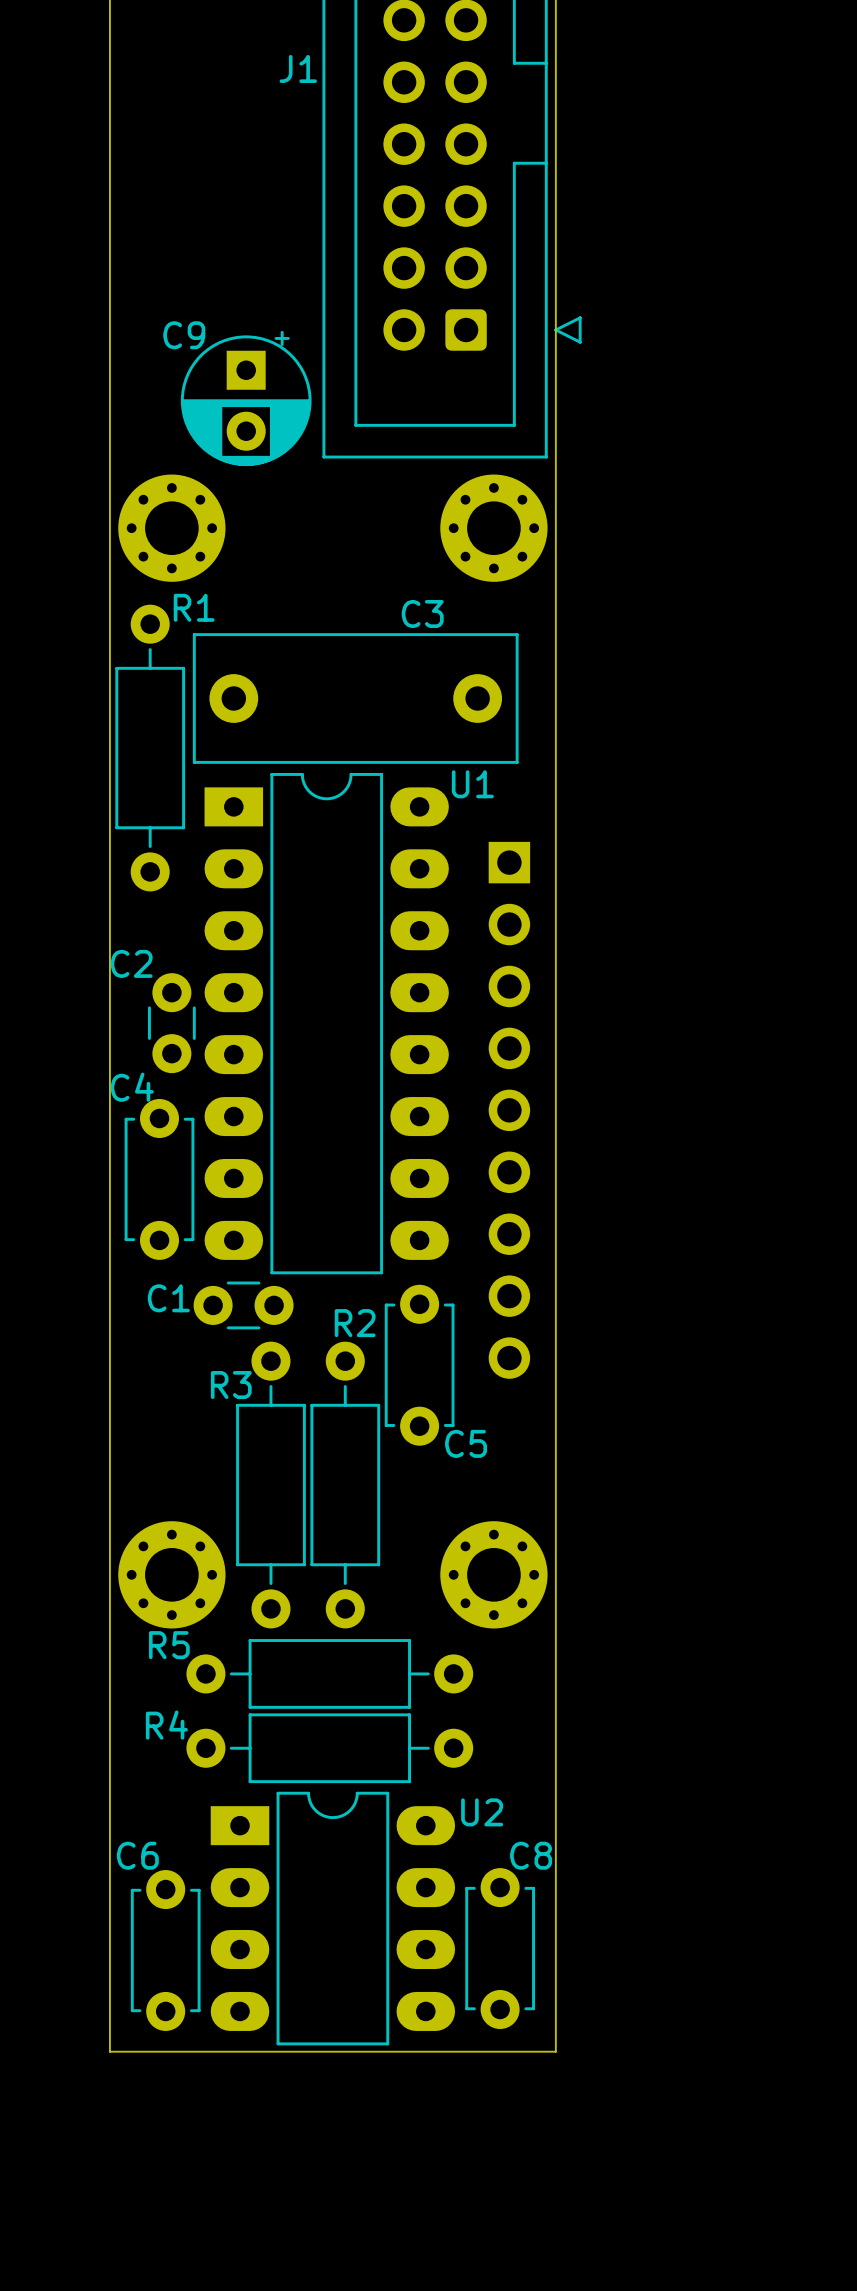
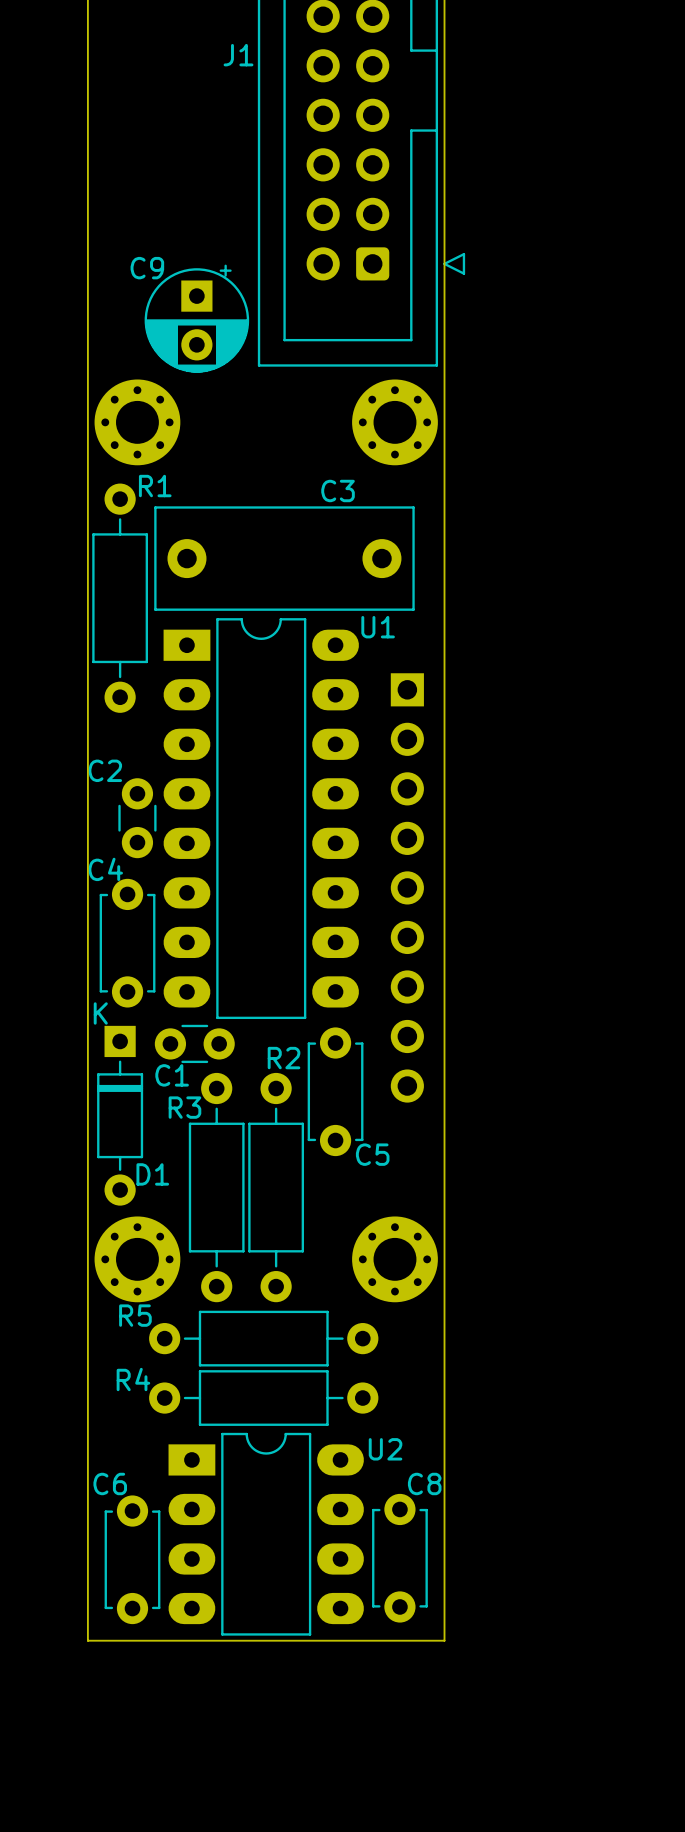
C1 name position: C1 (168, 1298) -> C1 (172, 1075)
D1: none -> (120, 1115)

